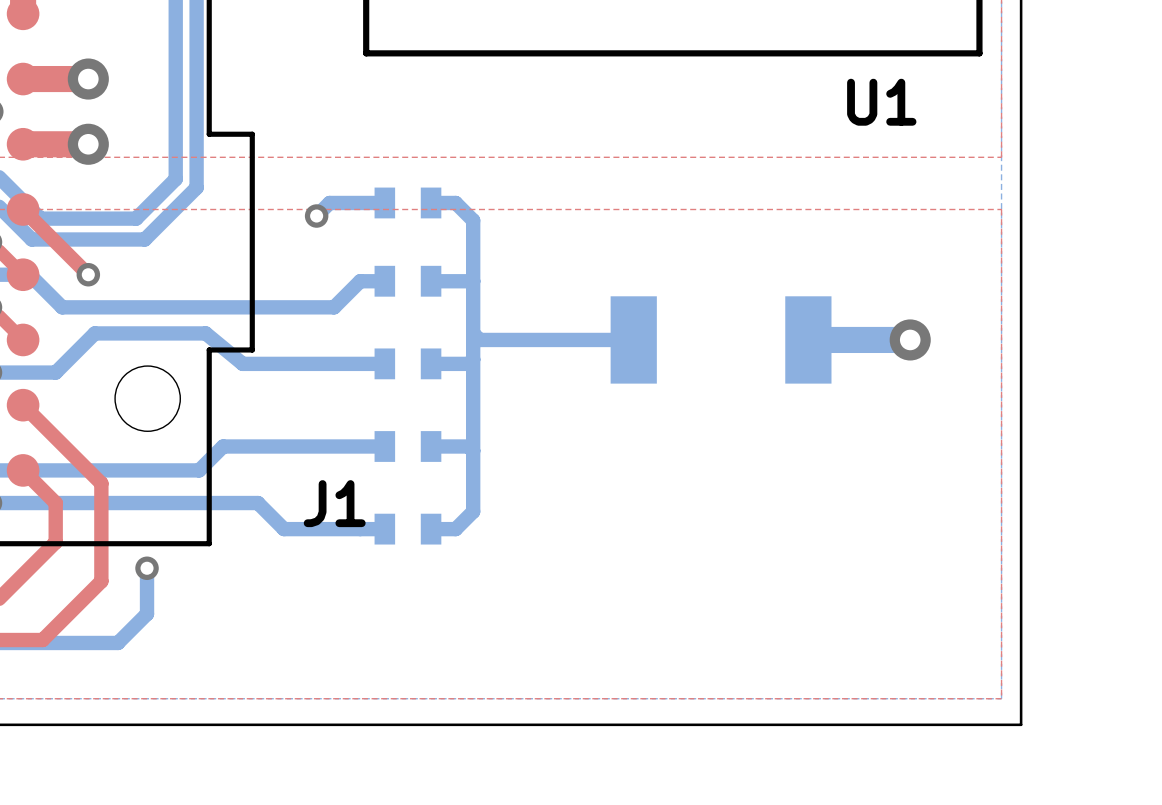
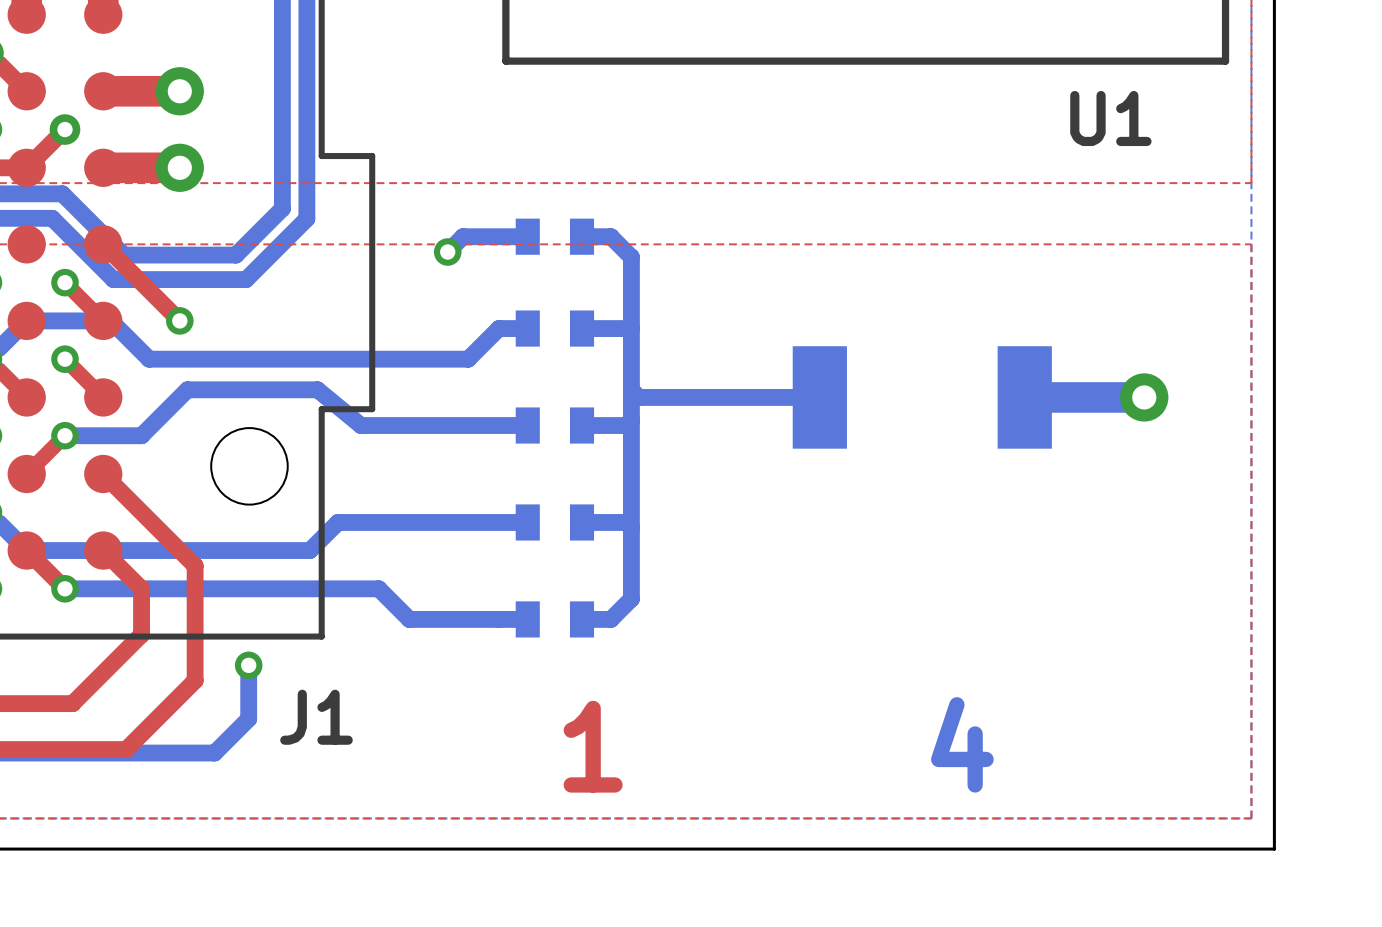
J1 name position: J1 (334, 503) -> J1 (316, 717)
text: none -> 4 (962, 744)
text: none -> 1 (593, 746)

